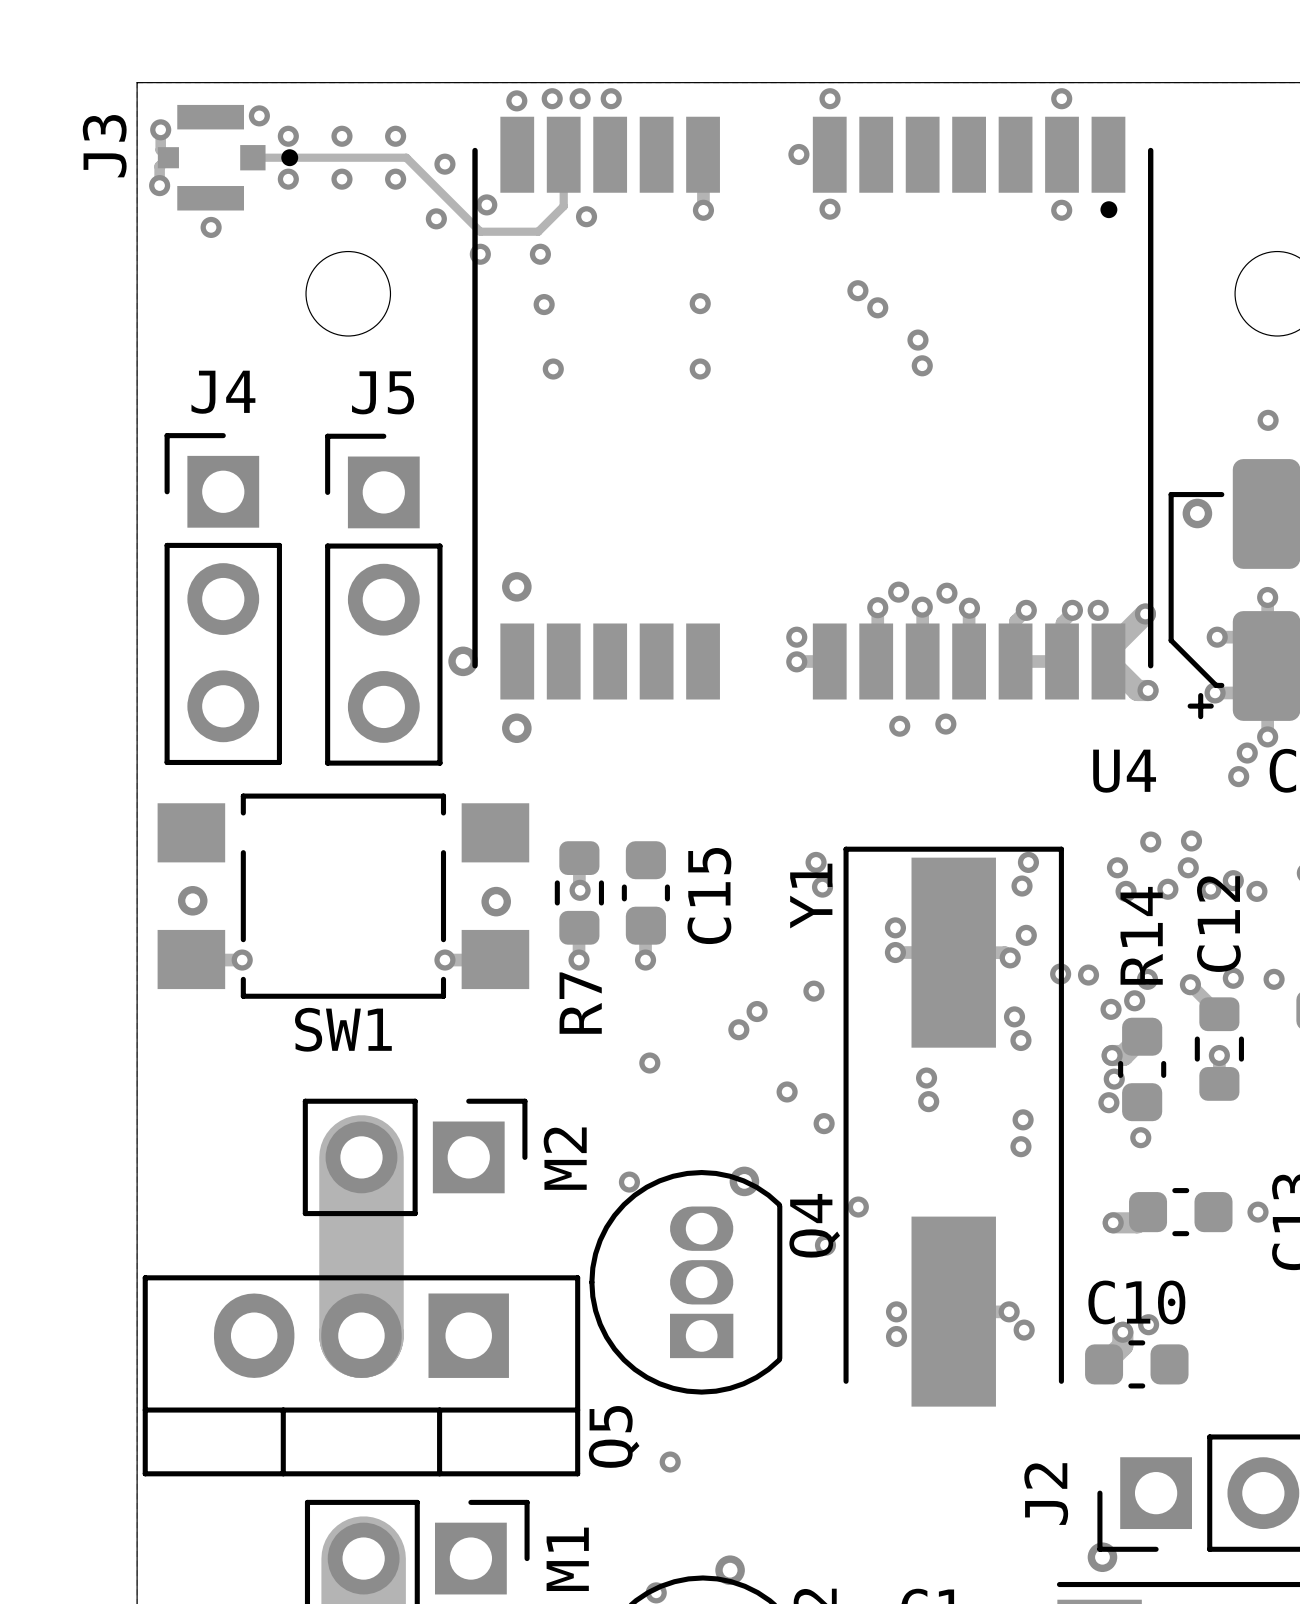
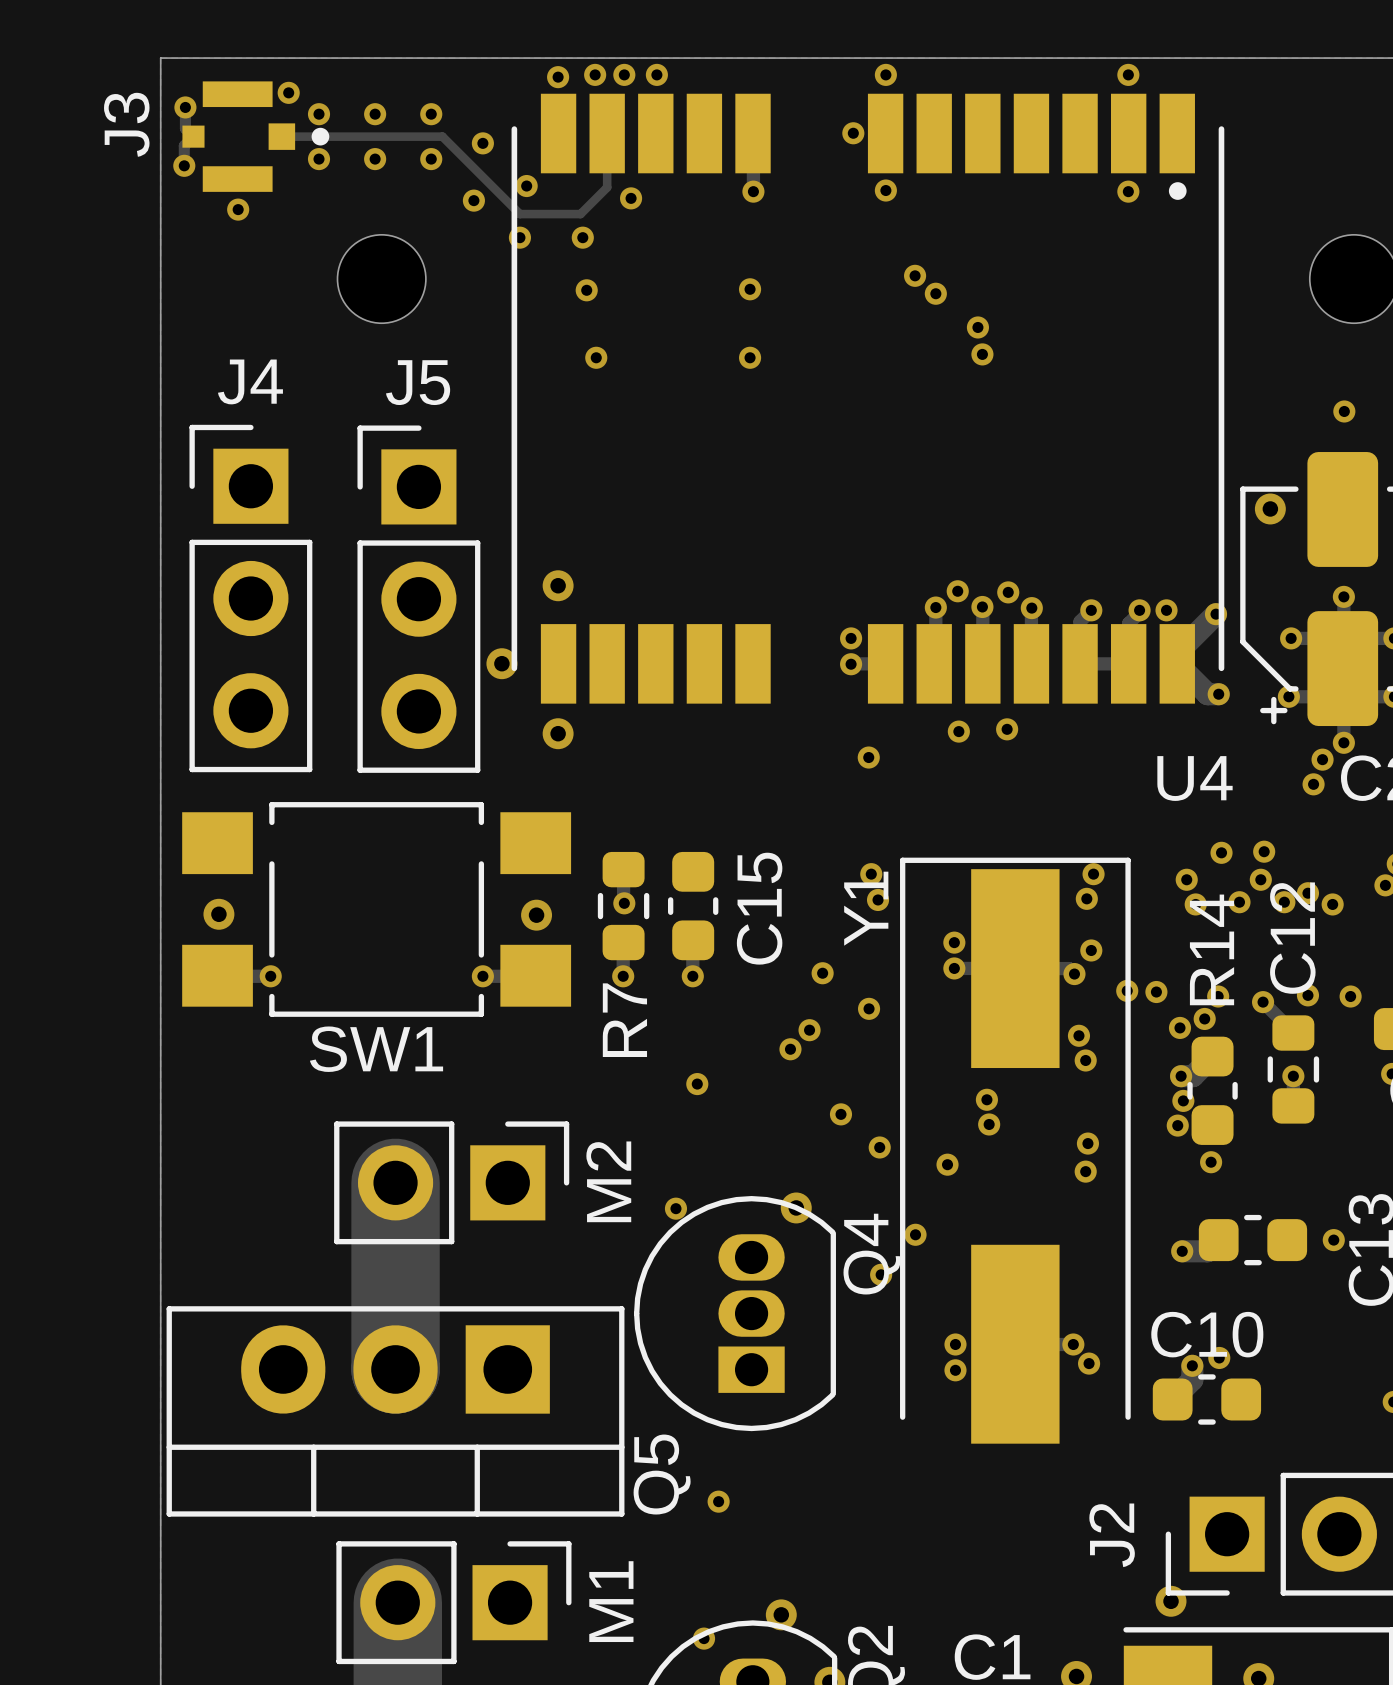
via: none -> (868, 757)
via: none -> (822, 973)
via: none -> (947, 1164)

